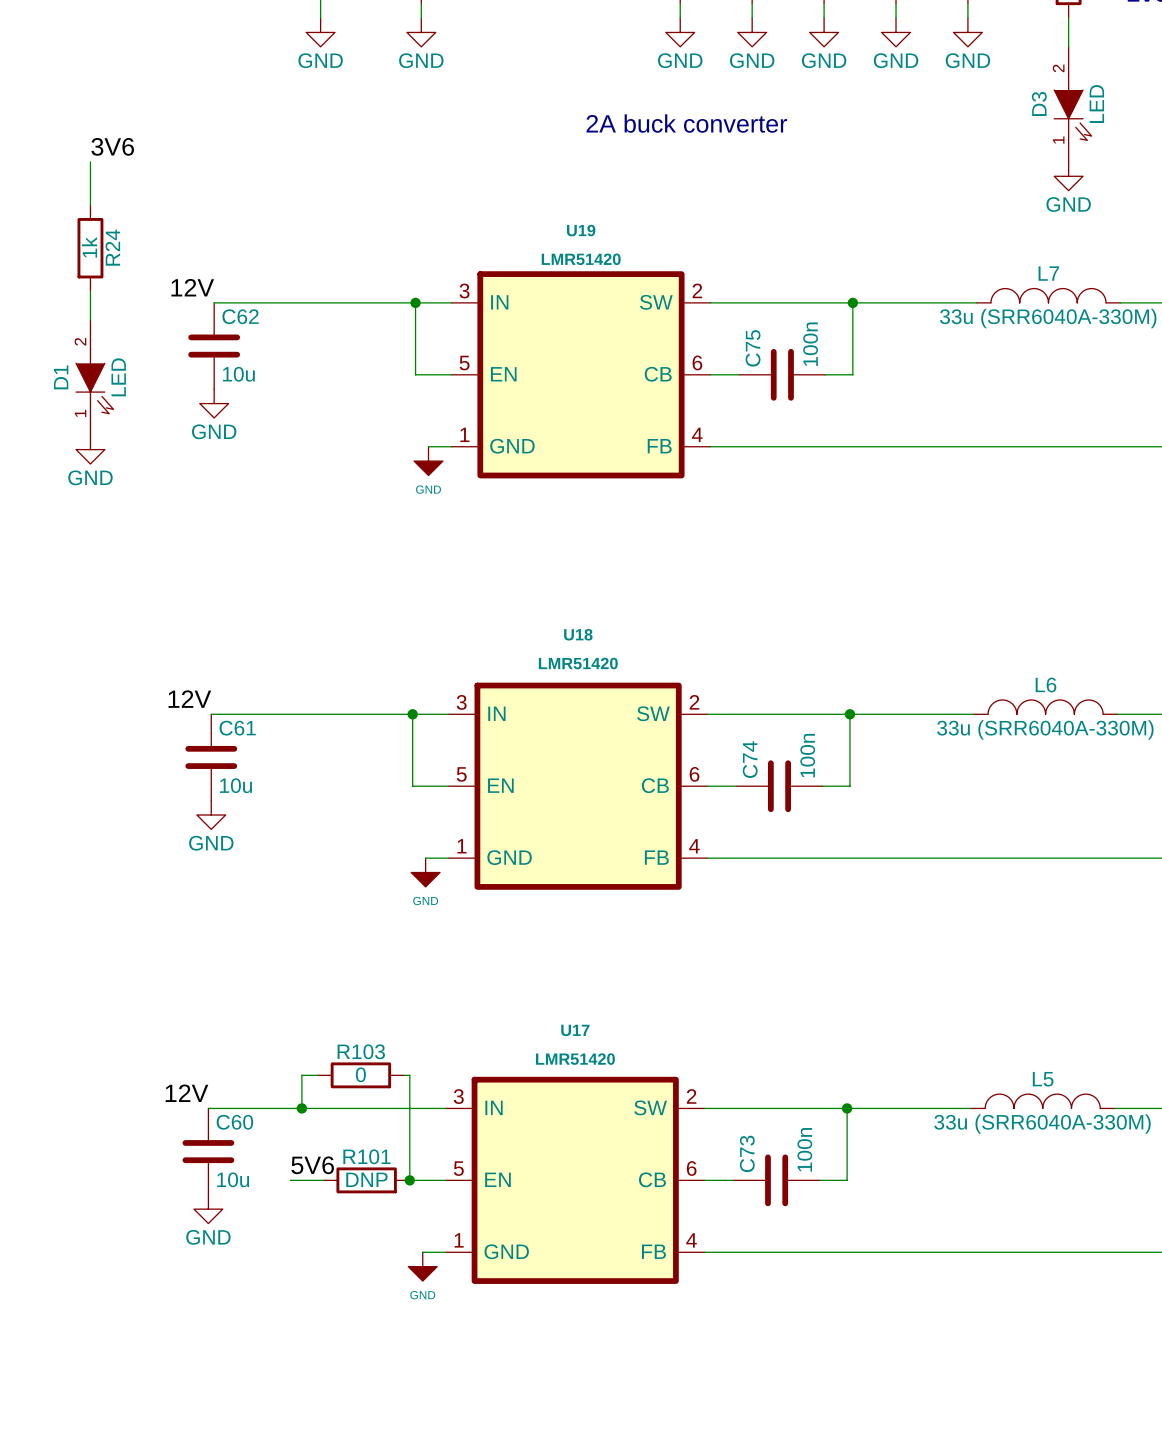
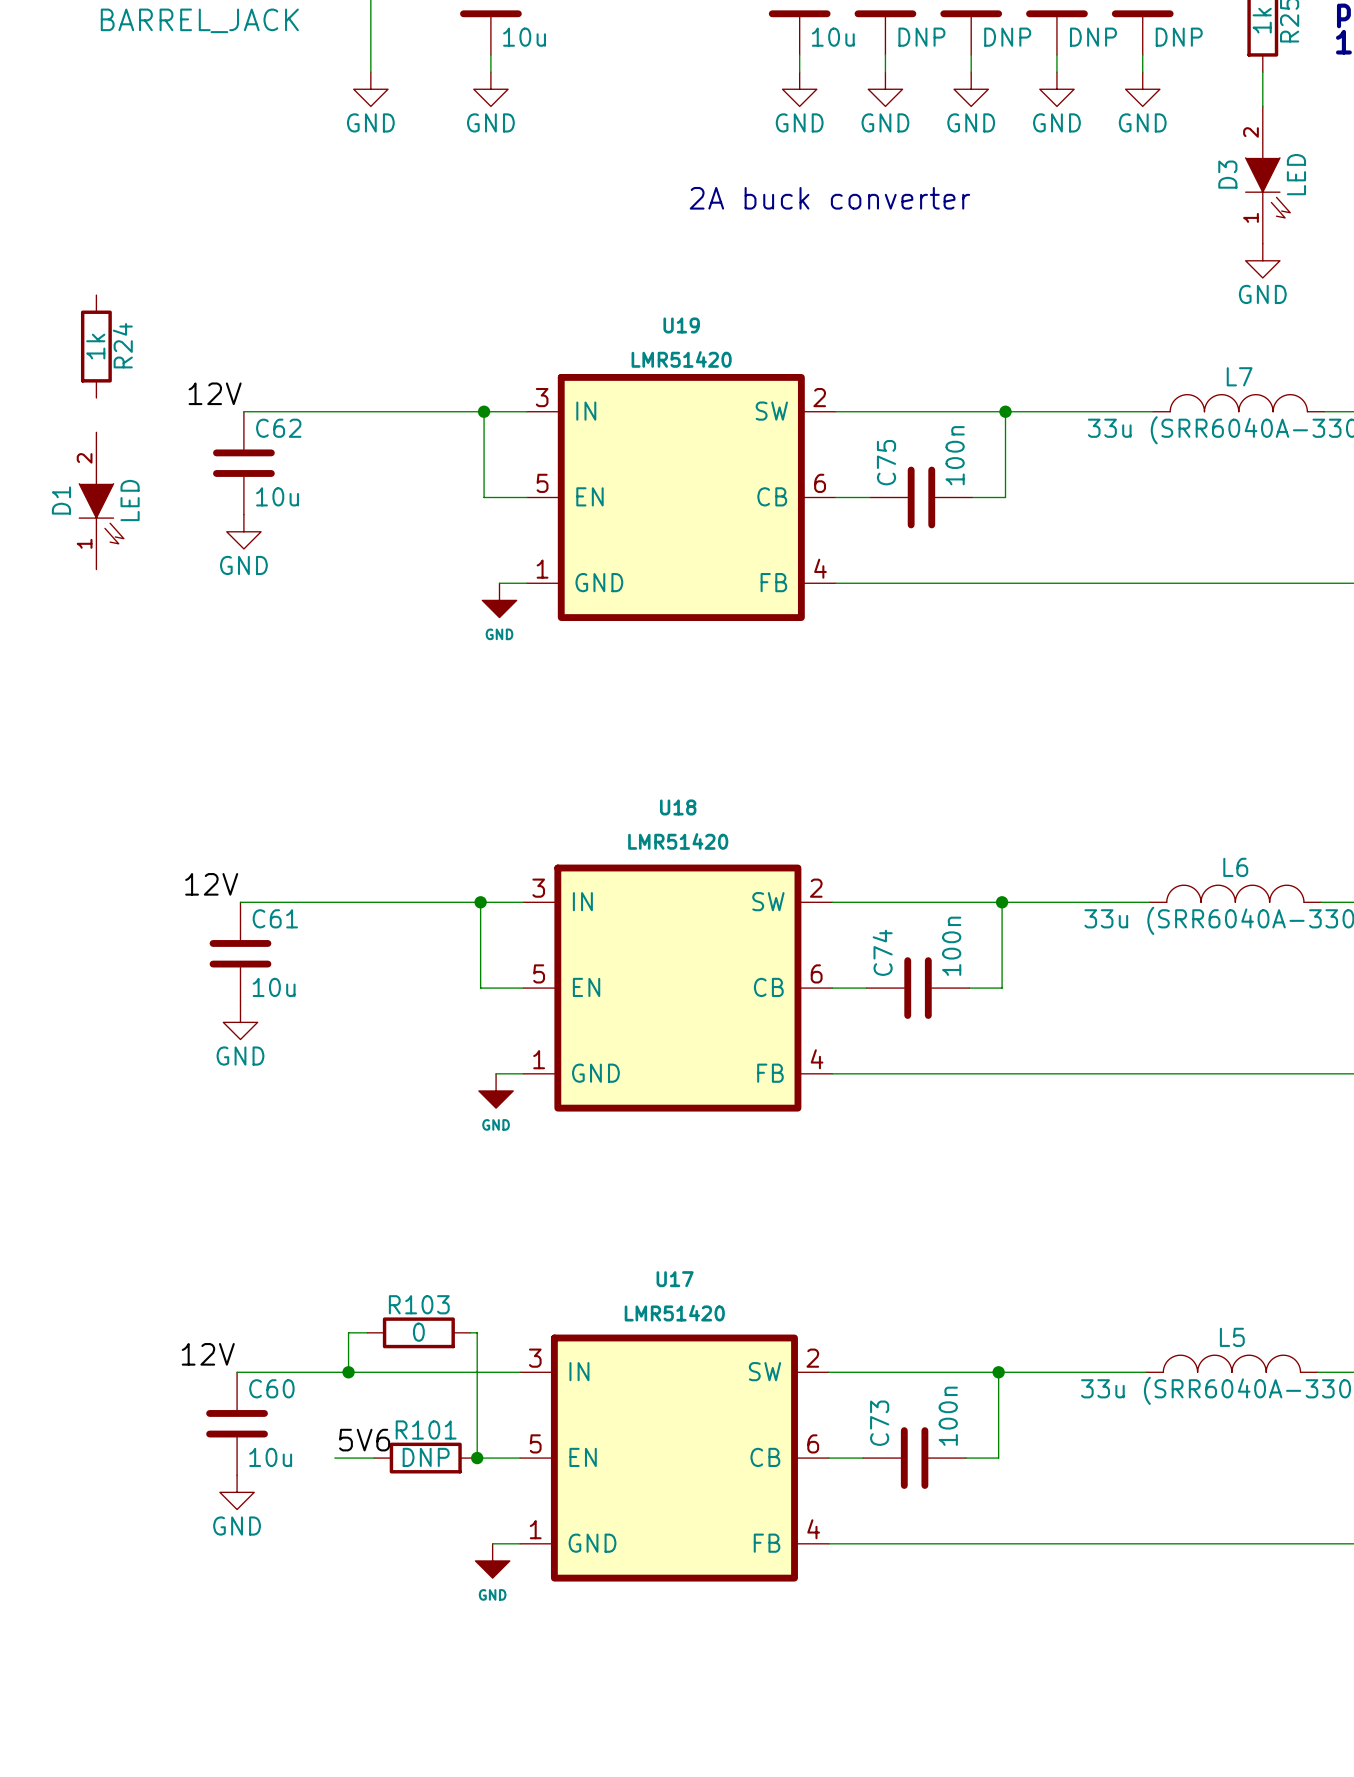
label: 3V6 (112, 146) -> none
wire: (90, 161) (90, 205) -> none
wire: (90, 291) (90, 320) -> none
power symbol: GND (90, 449) -> none

